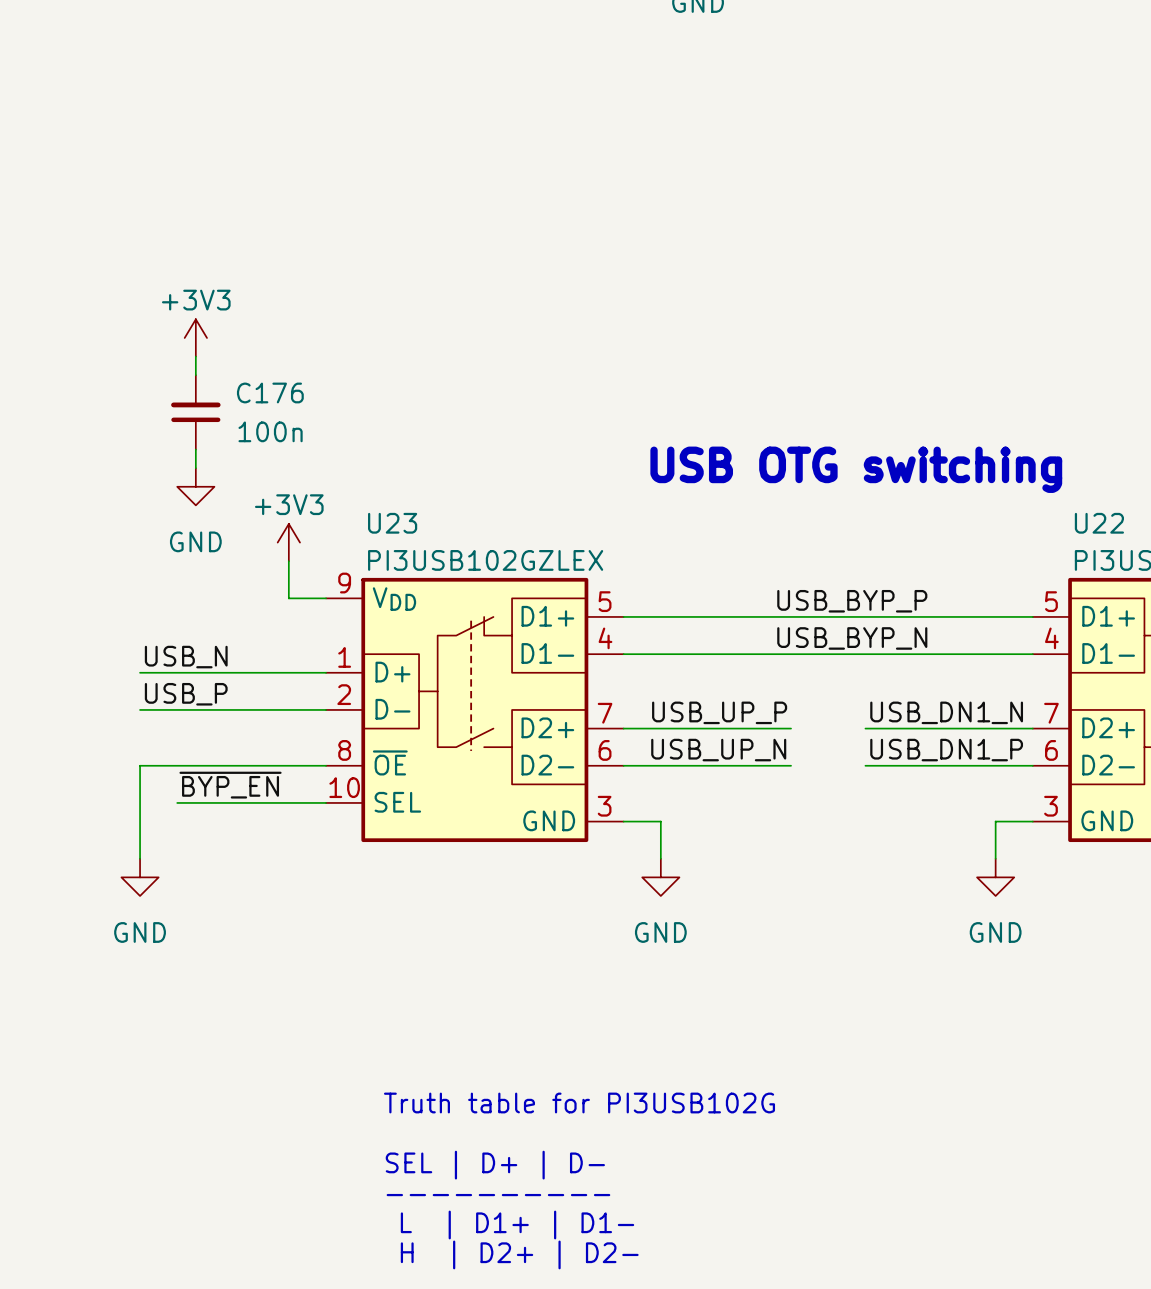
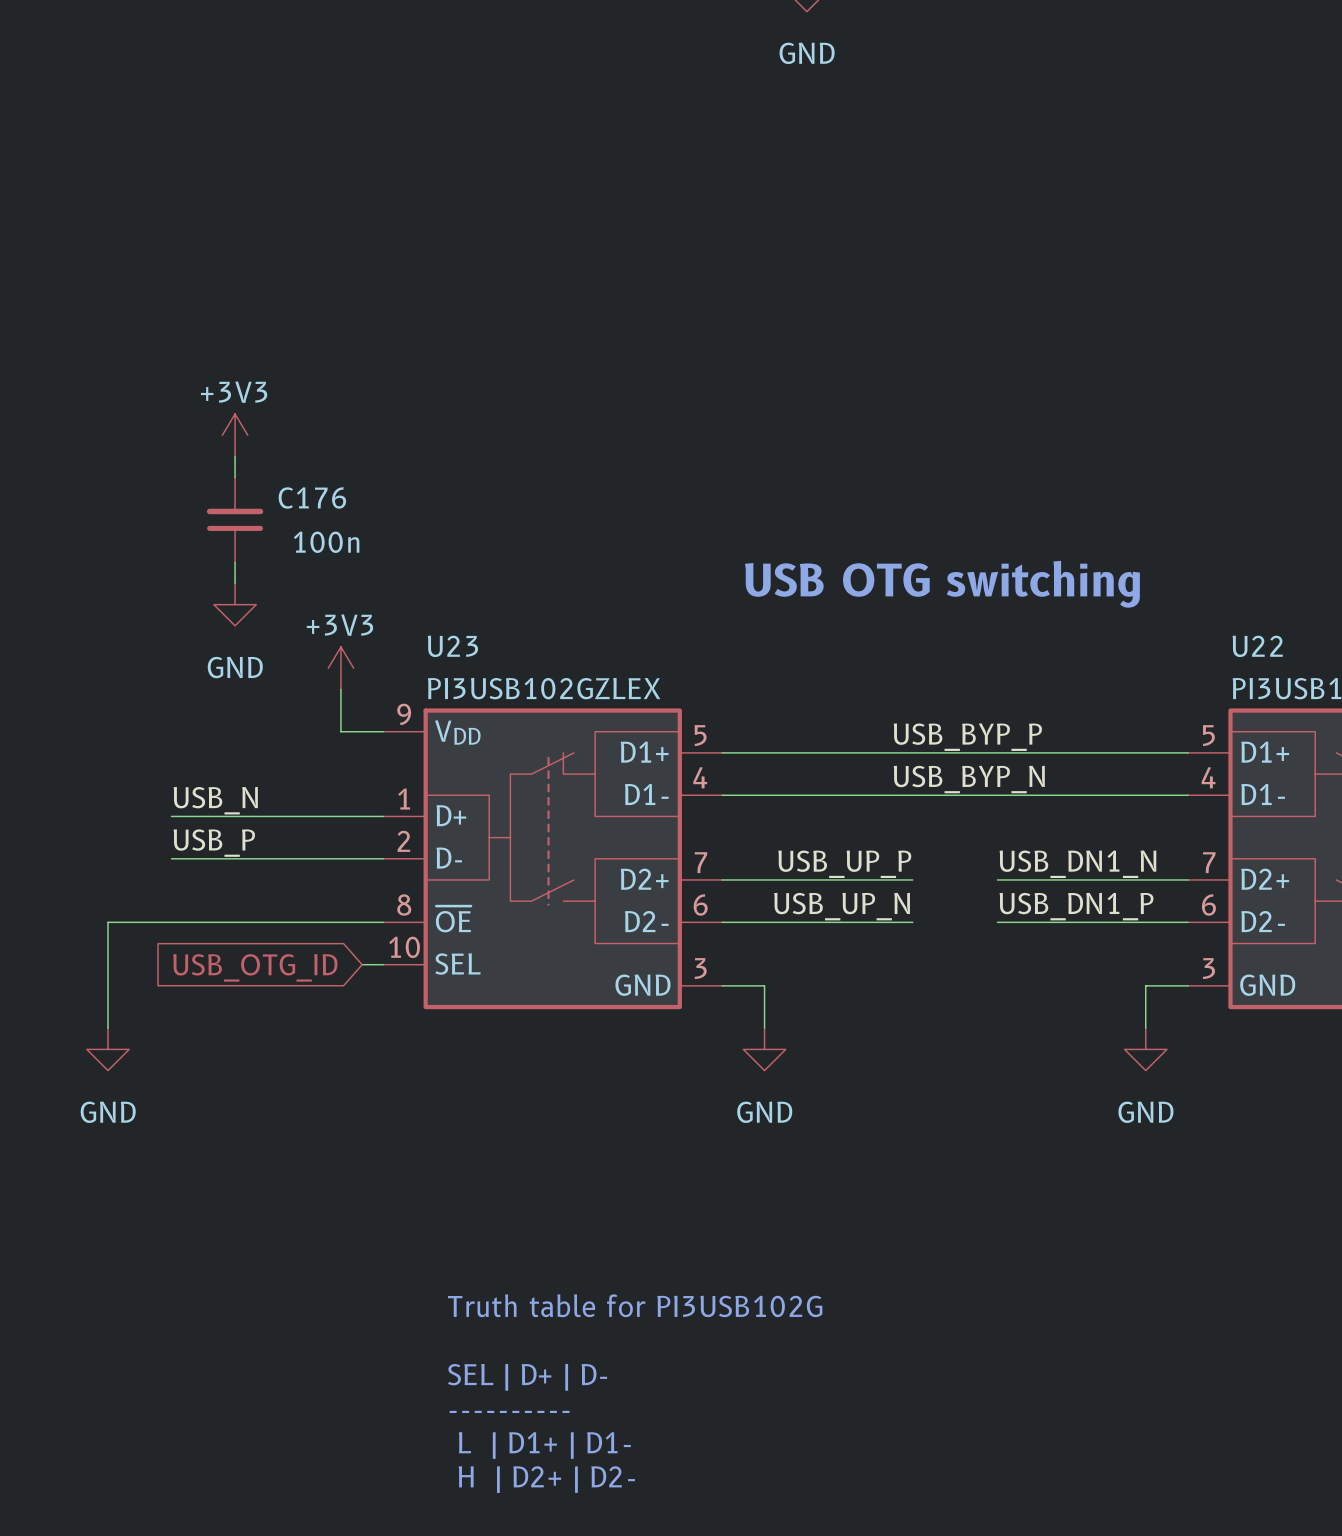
wire: (140, 765) (140, 858) -> (171, 922) (108, 922) (108, 1028)
label: ~{BYP_EN} (230, 785) -> none
wire: (177, 802) (307, 802) -> none
global label: none -> USB_OTG_ID (255, 967)
power symbol position: GND (140, 877) -> GND (108, 1049)

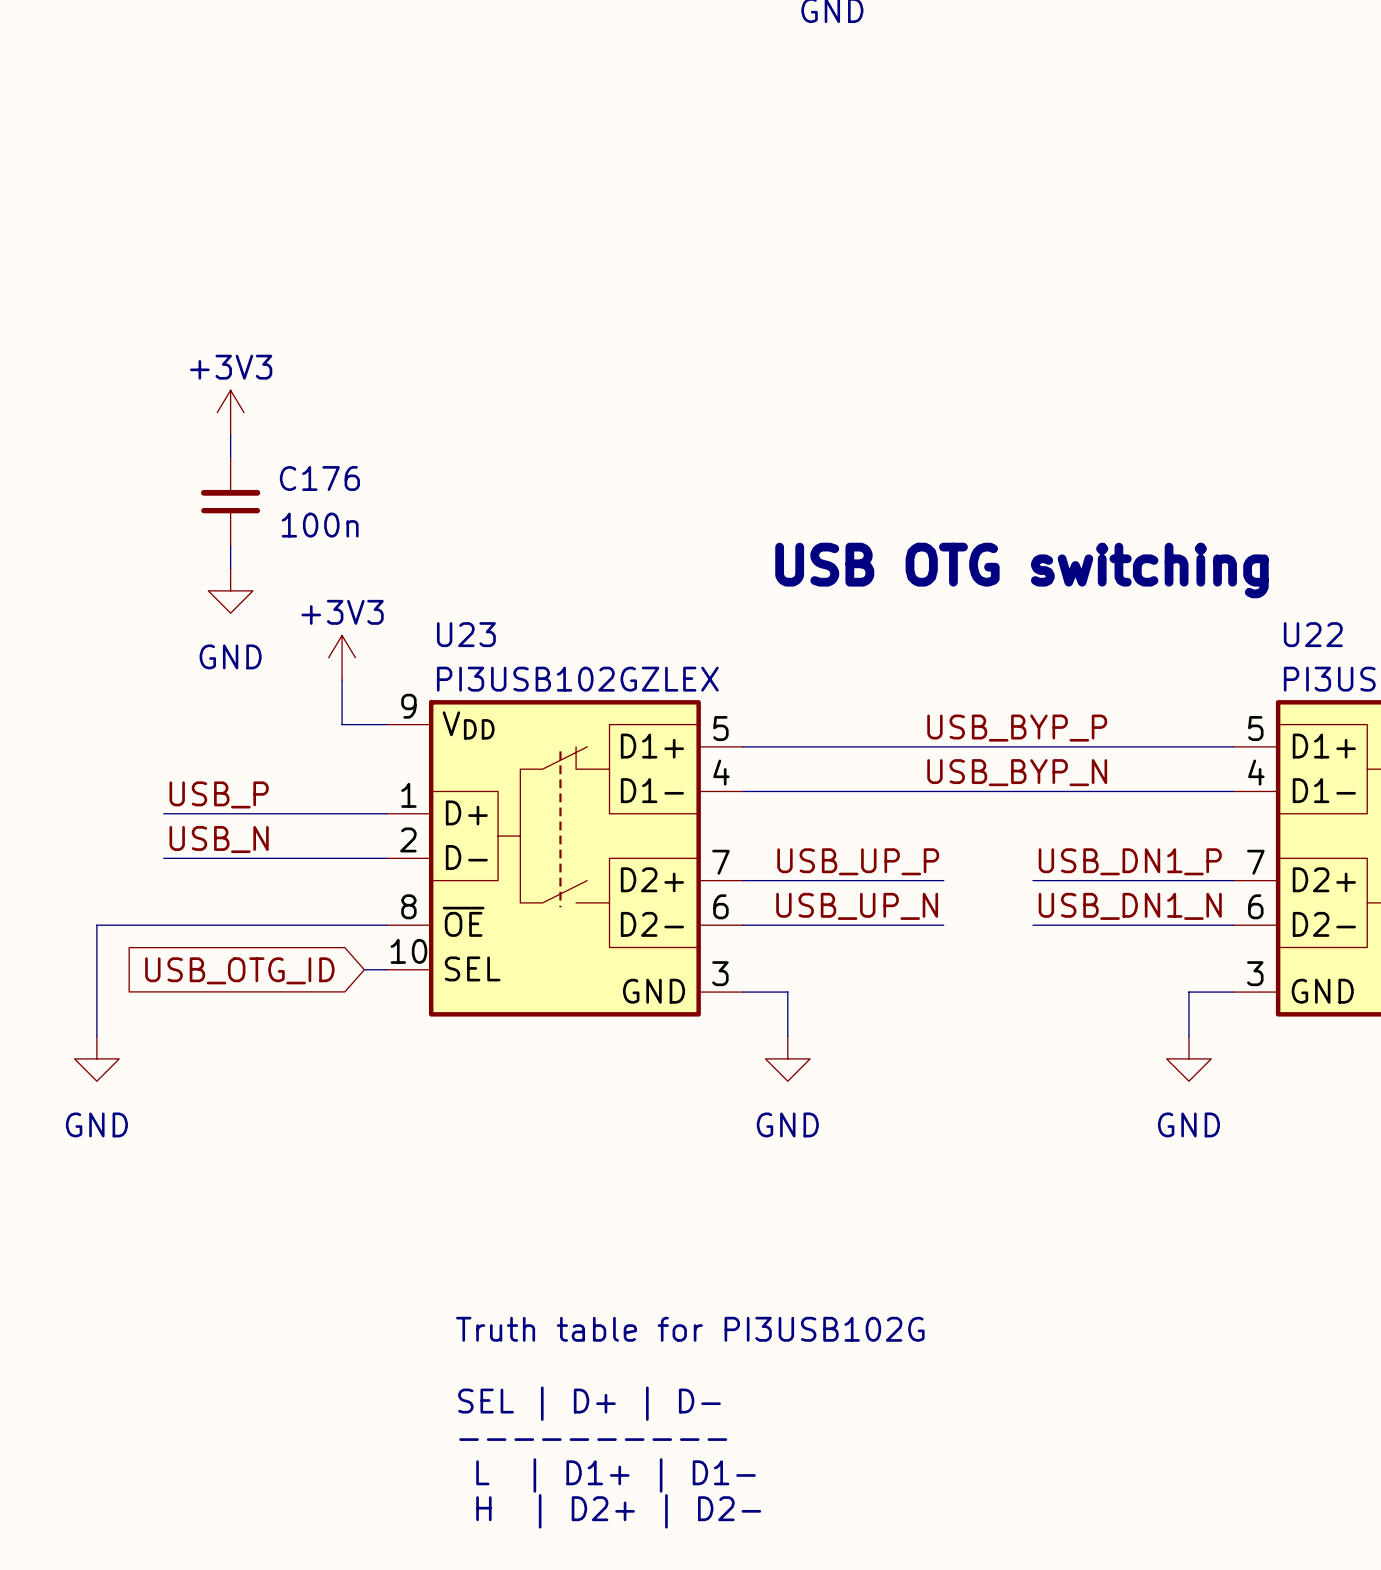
label: USB_N (215, 800) -> USB_P (219, 794)
label: USB_P (214, 843) -> USB_N (219, 839)
label: USB_DN1_N (1077, 864) -> USB_DN1_P (1130, 861)
label: USB_DN1_P (1076, 906) -> USB_DN1_N (1130, 906)

